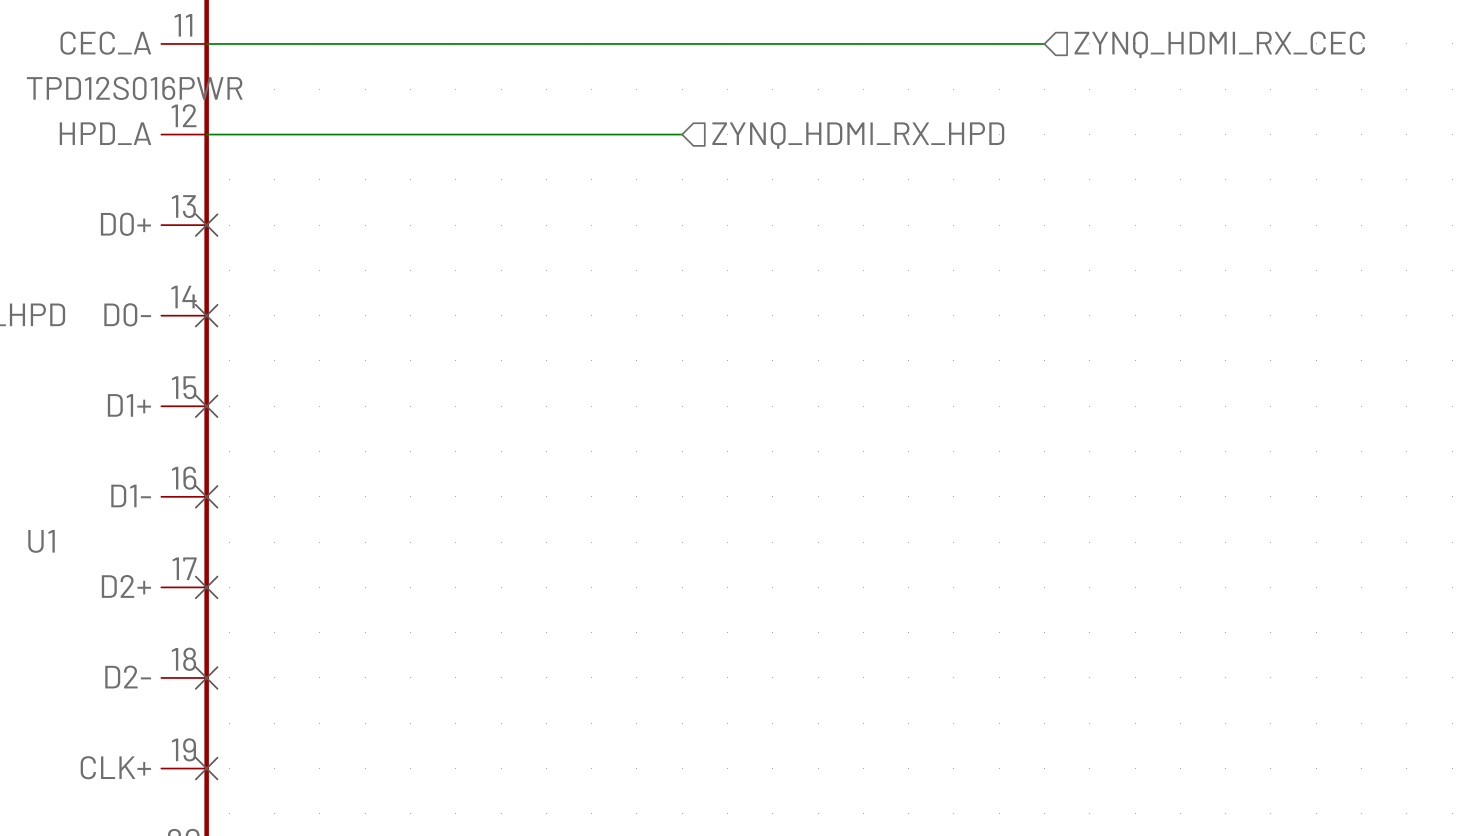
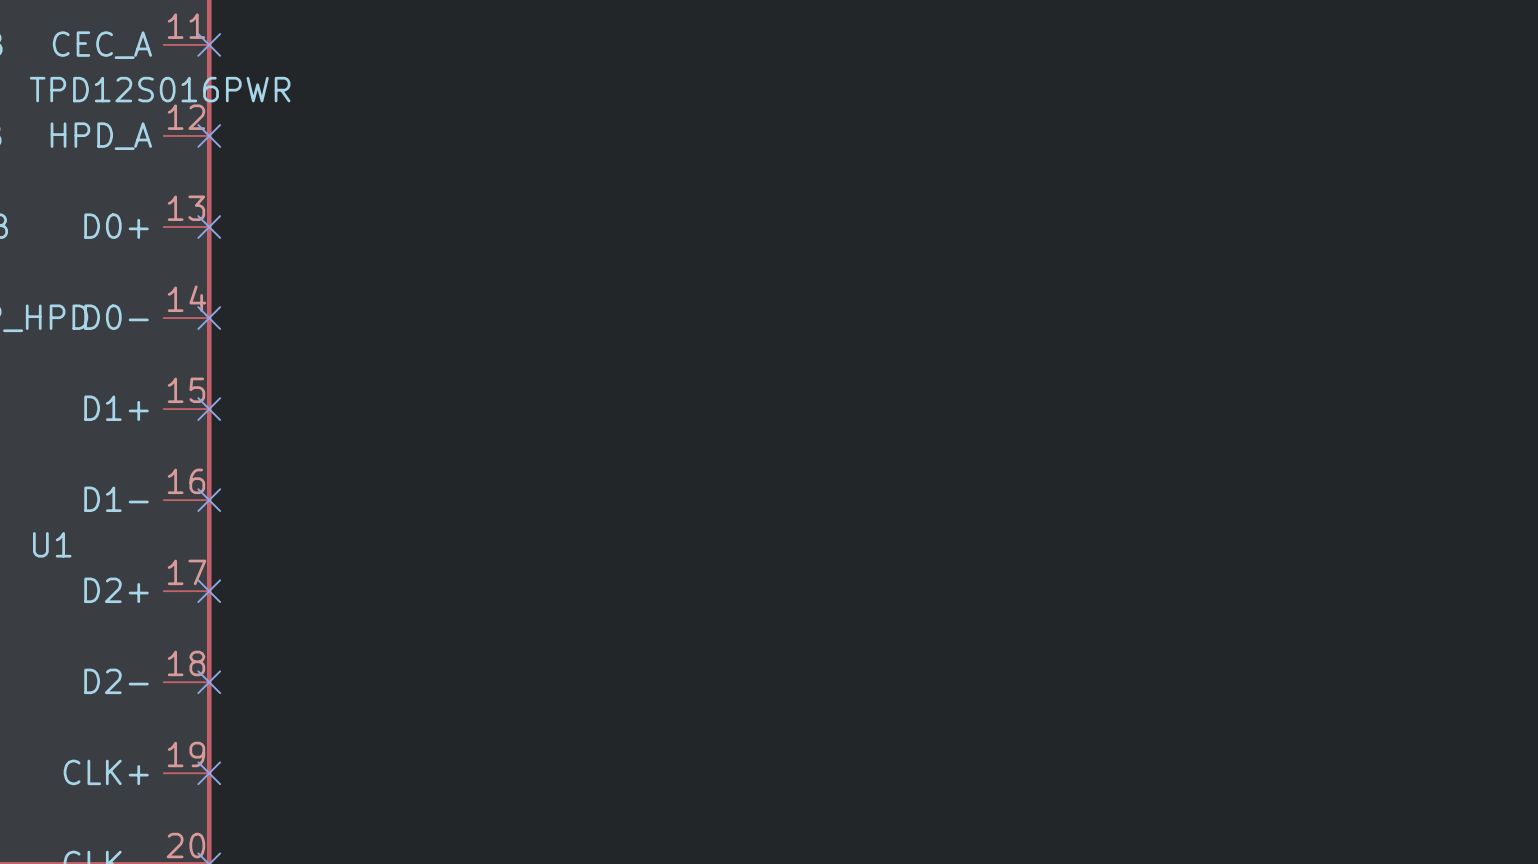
wire: (206, 43) (1044, 43) -> none
no-connect mark: none -> (209, 44)
hierarchical label: ZYNQ_HDMI_RX_CEC (1219, 44) -> none
wire: (206, 134) (682, 134) -> none
no-connect mark: none -> (209, 135)
hierarchical label: ZYNQ_HDMI_RX_HPD (858, 135) -> none

